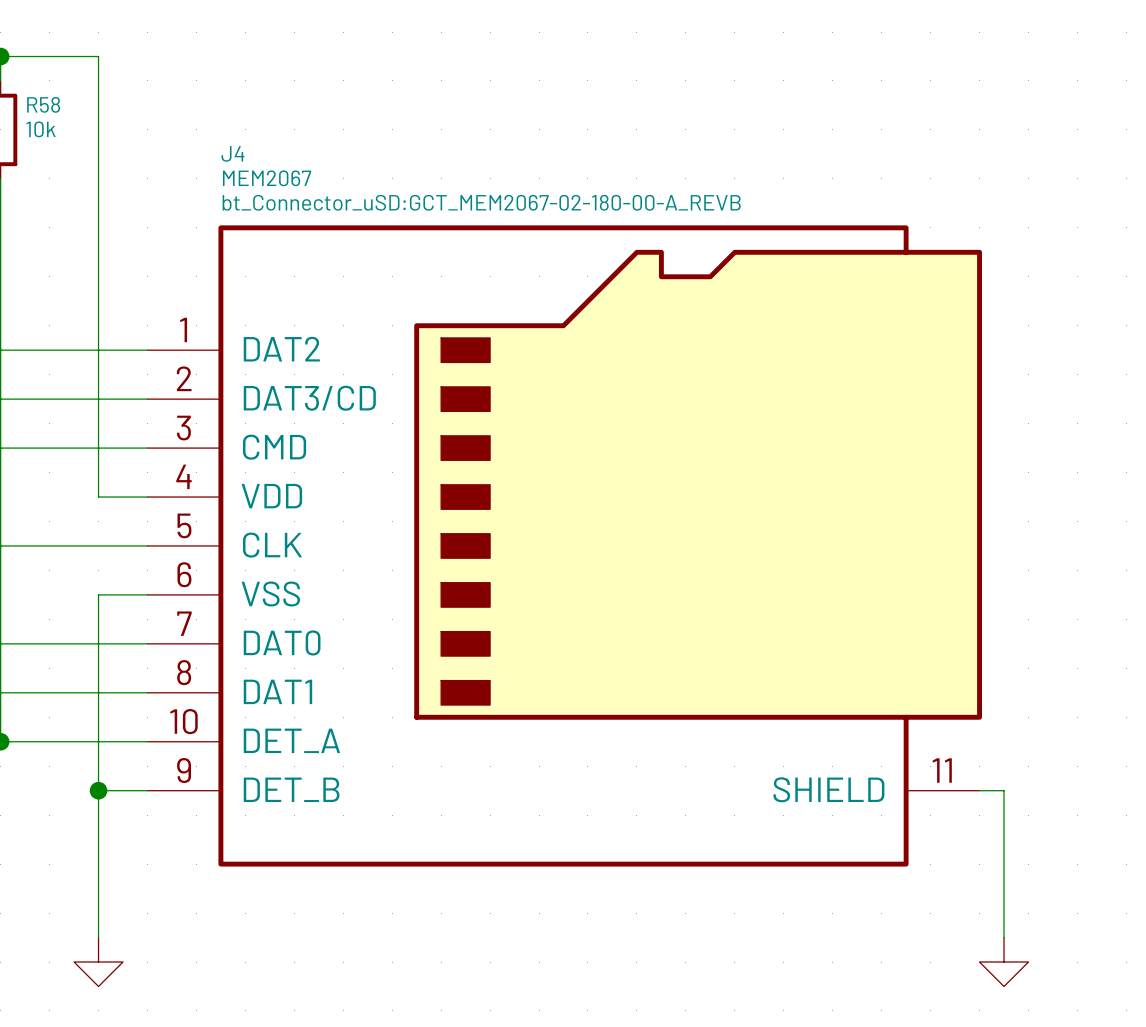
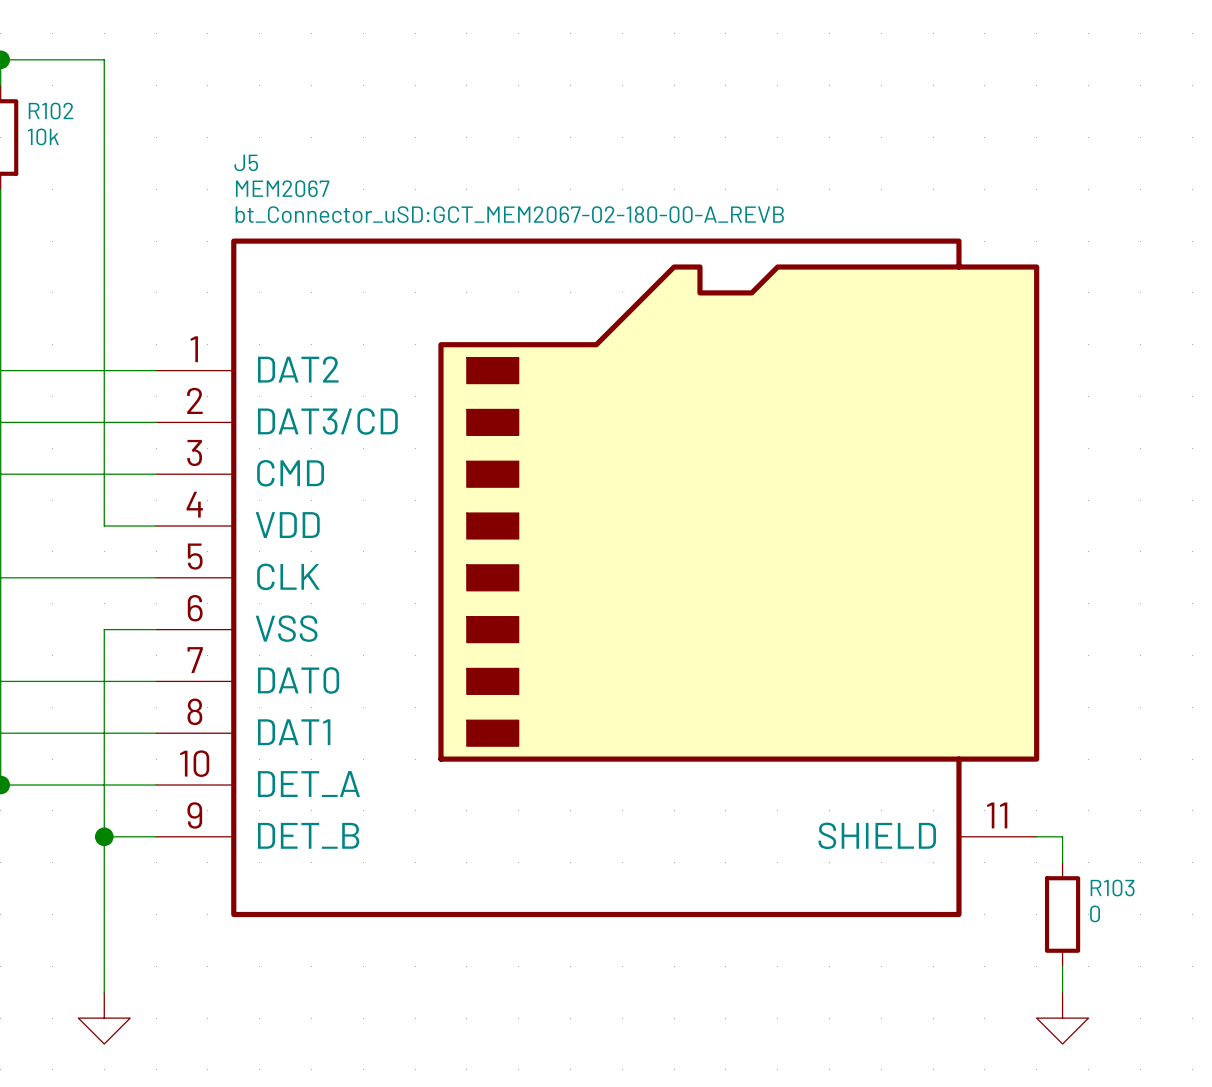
R58 name: R58 (43, 104) -> R102 (51, 111)
J4 name: J4 (232, 153) -> J5 (246, 162)
wire: (1004, 815) (1004, 913) -> none
R103: none -> 0 (1062, 914)

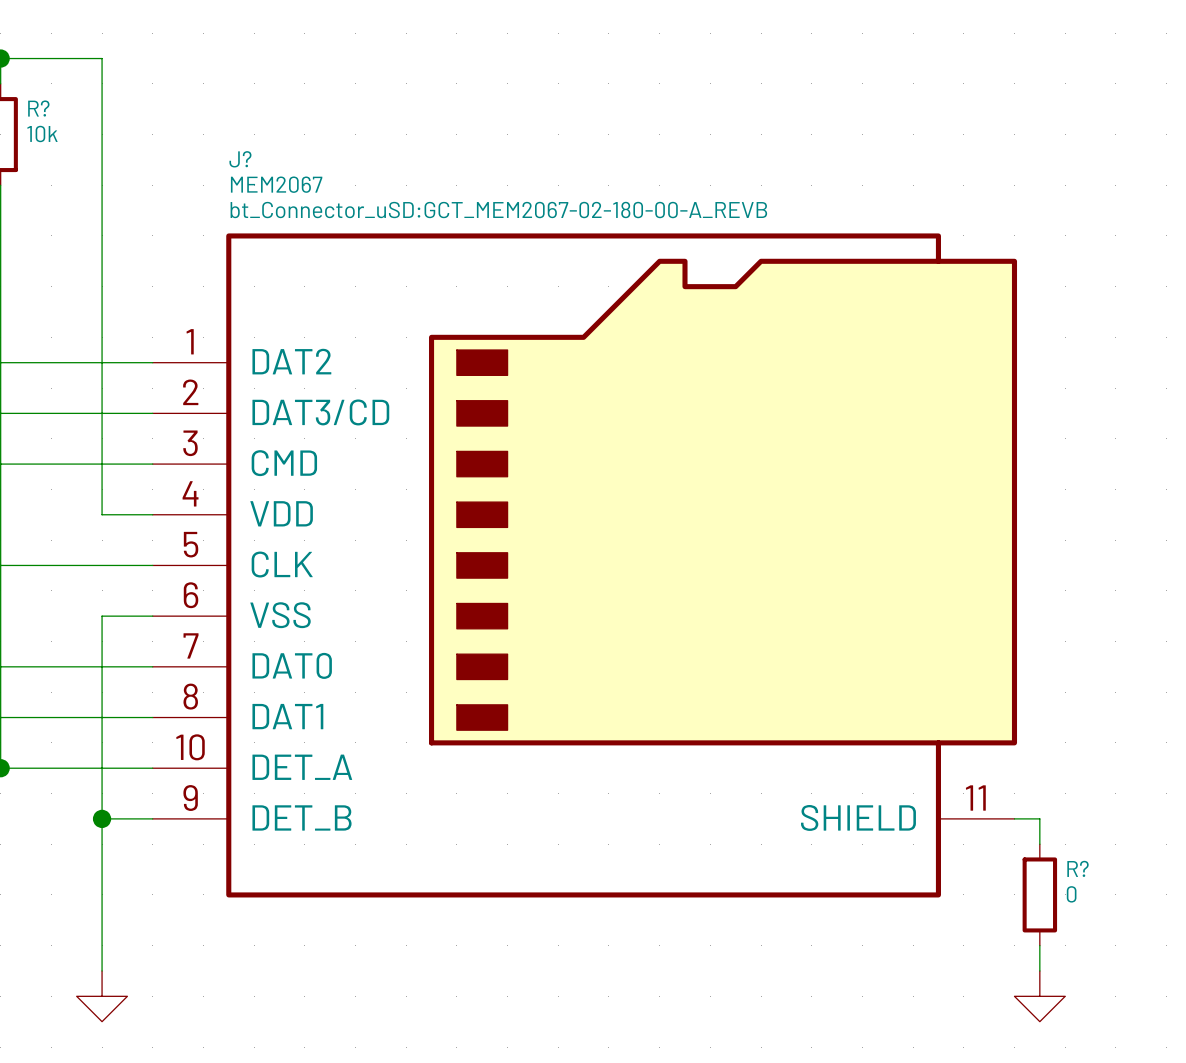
R102 name: R102 (51, 111) -> R? (38, 108)
J5 name: J5 (246, 162) -> J? (240, 159)
R103 name: R103 (1112, 888) -> R? (1078, 868)

